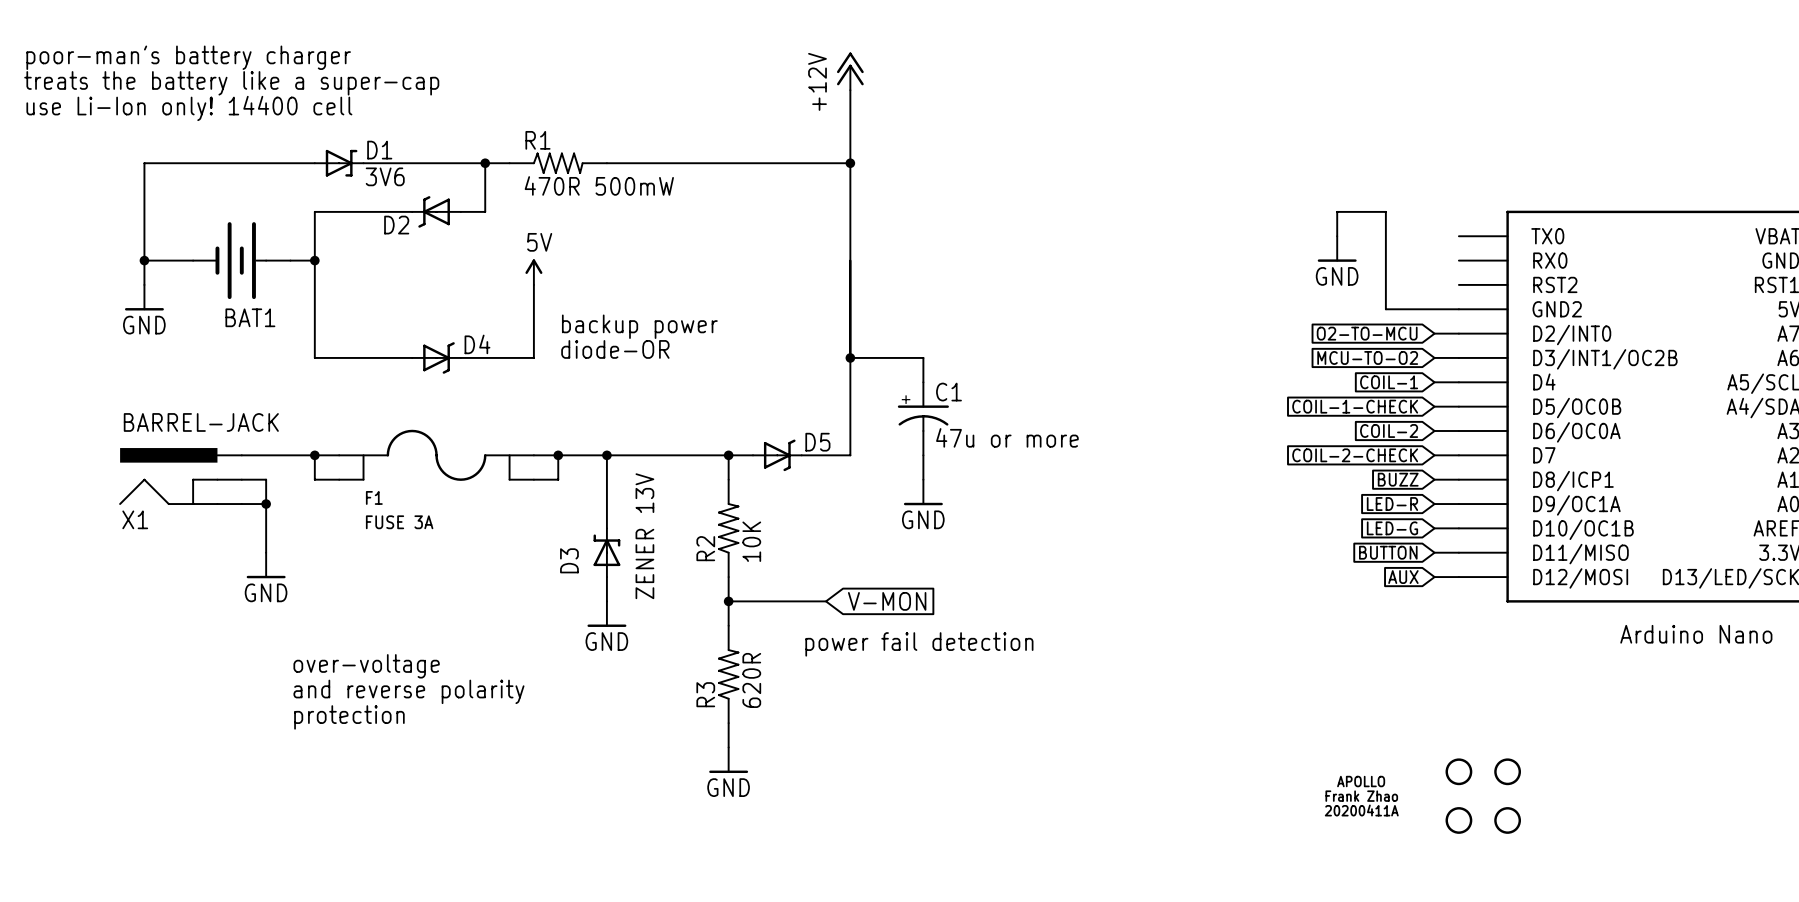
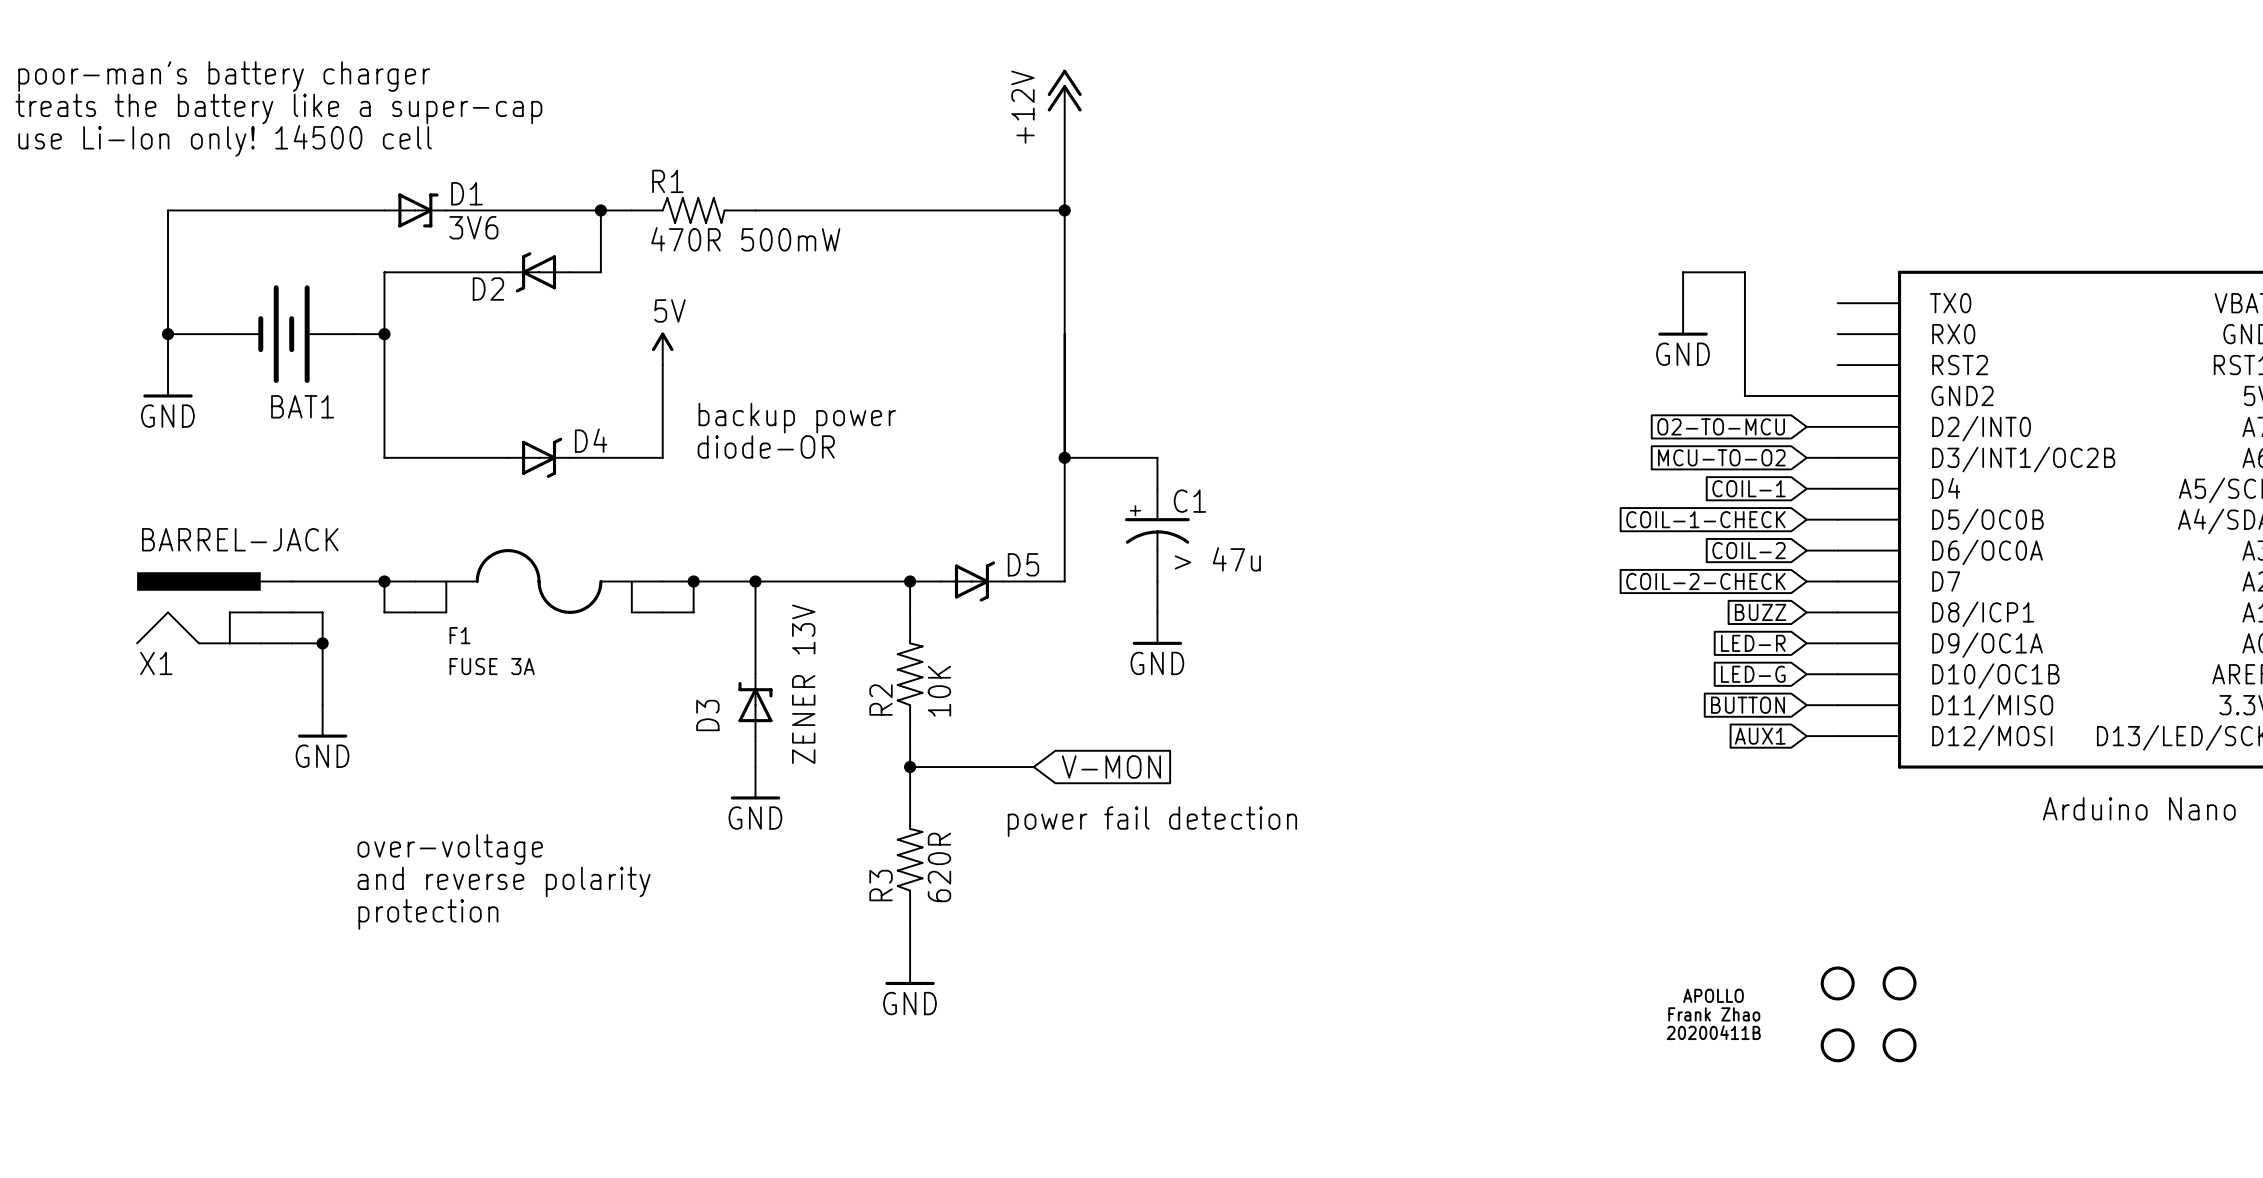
text: use Li-Ion only! 14400 cell (189, 108) -> use Li-Ion only! 14500 cell (225, 140)
C1 value: 47u or more (1007, 437) -> > 47u (1217, 559)
global label: AUX (1403, 577) -> AUX1 (1760, 736)
part text: 20200411A (1361, 810) -> 20200411B (1713, 1032)

